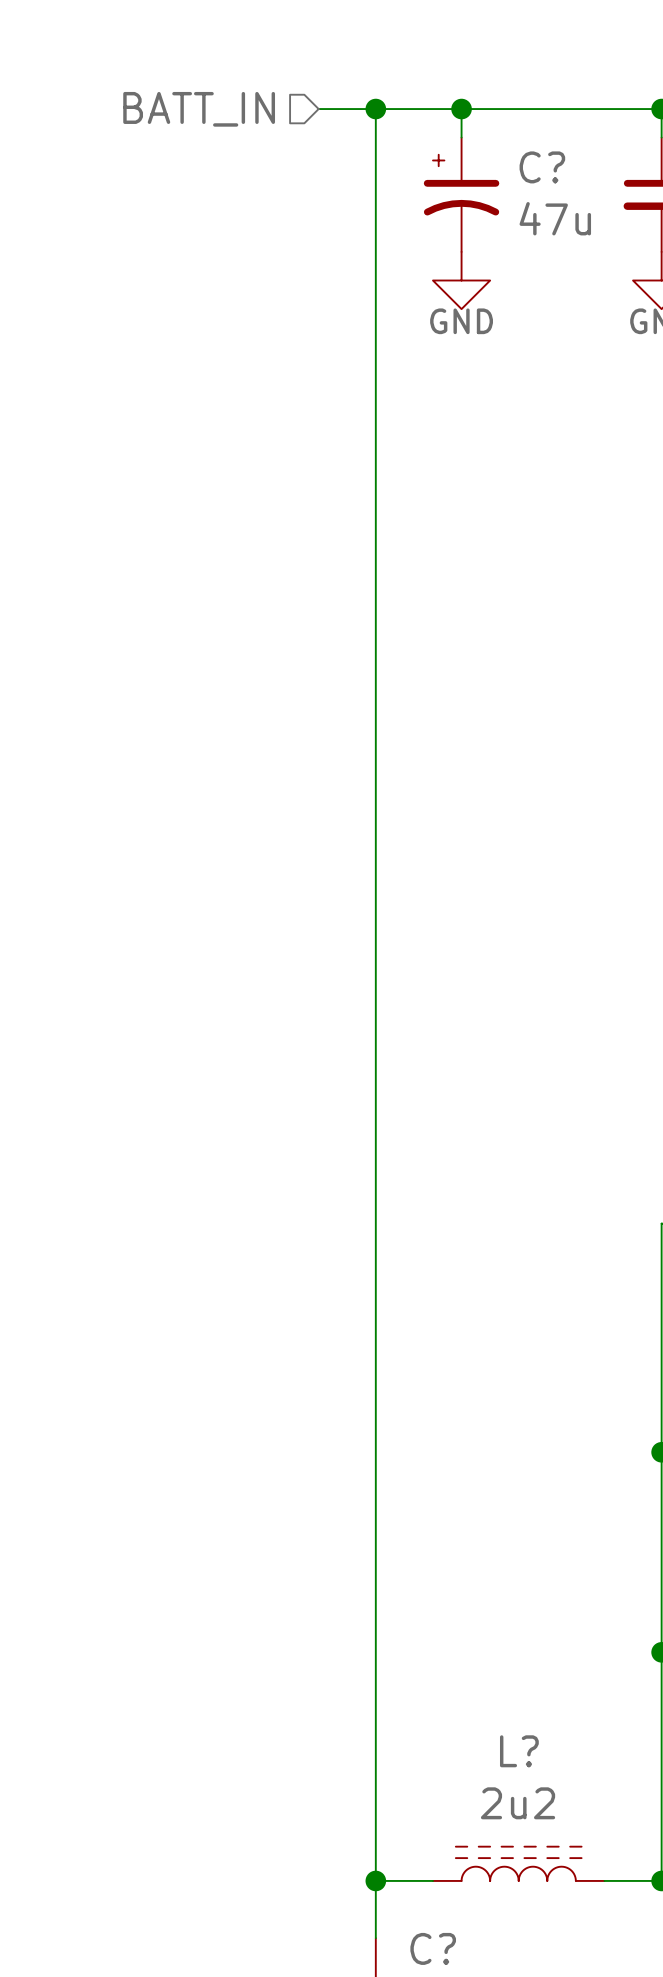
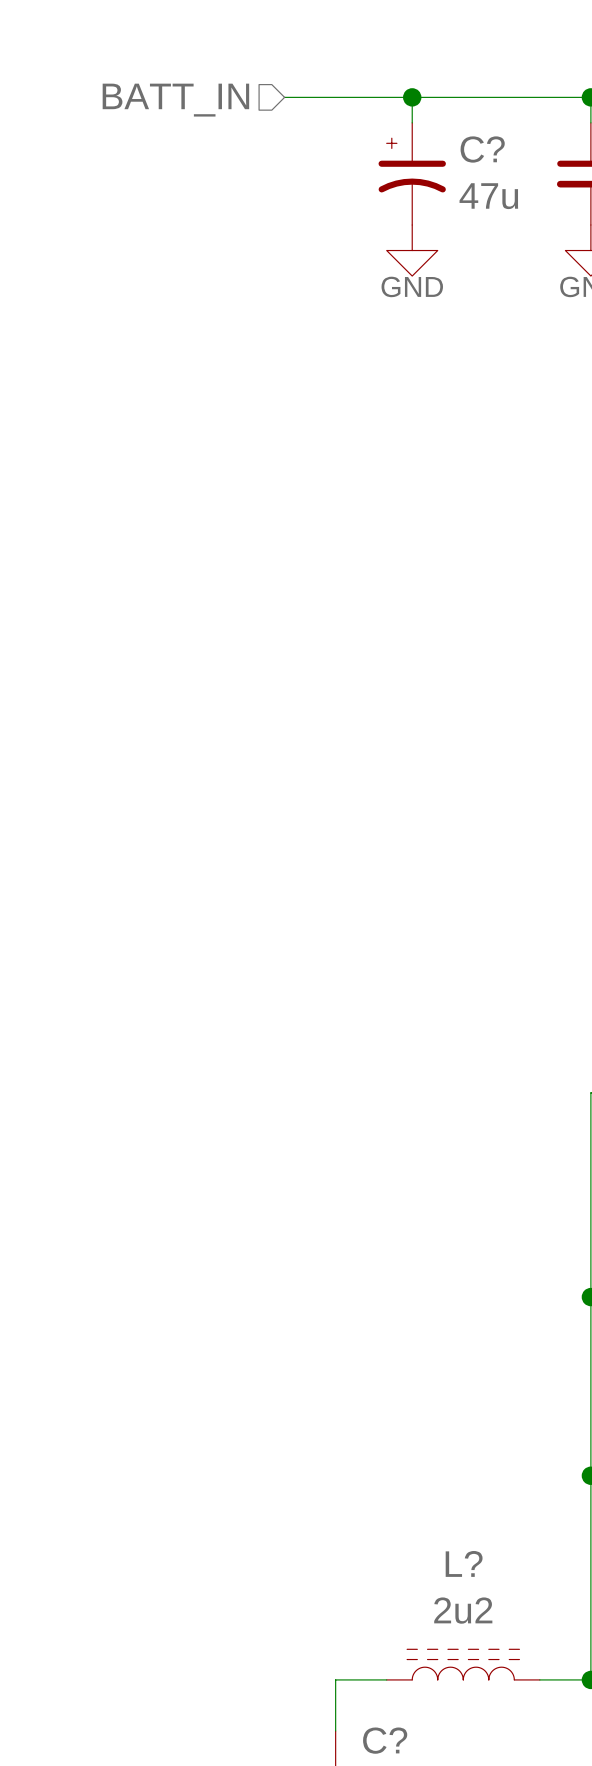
wire: (375, 109) (375, 1880) -> none
junction: (375, 109) -> none
junction: (375, 1880) -> none

